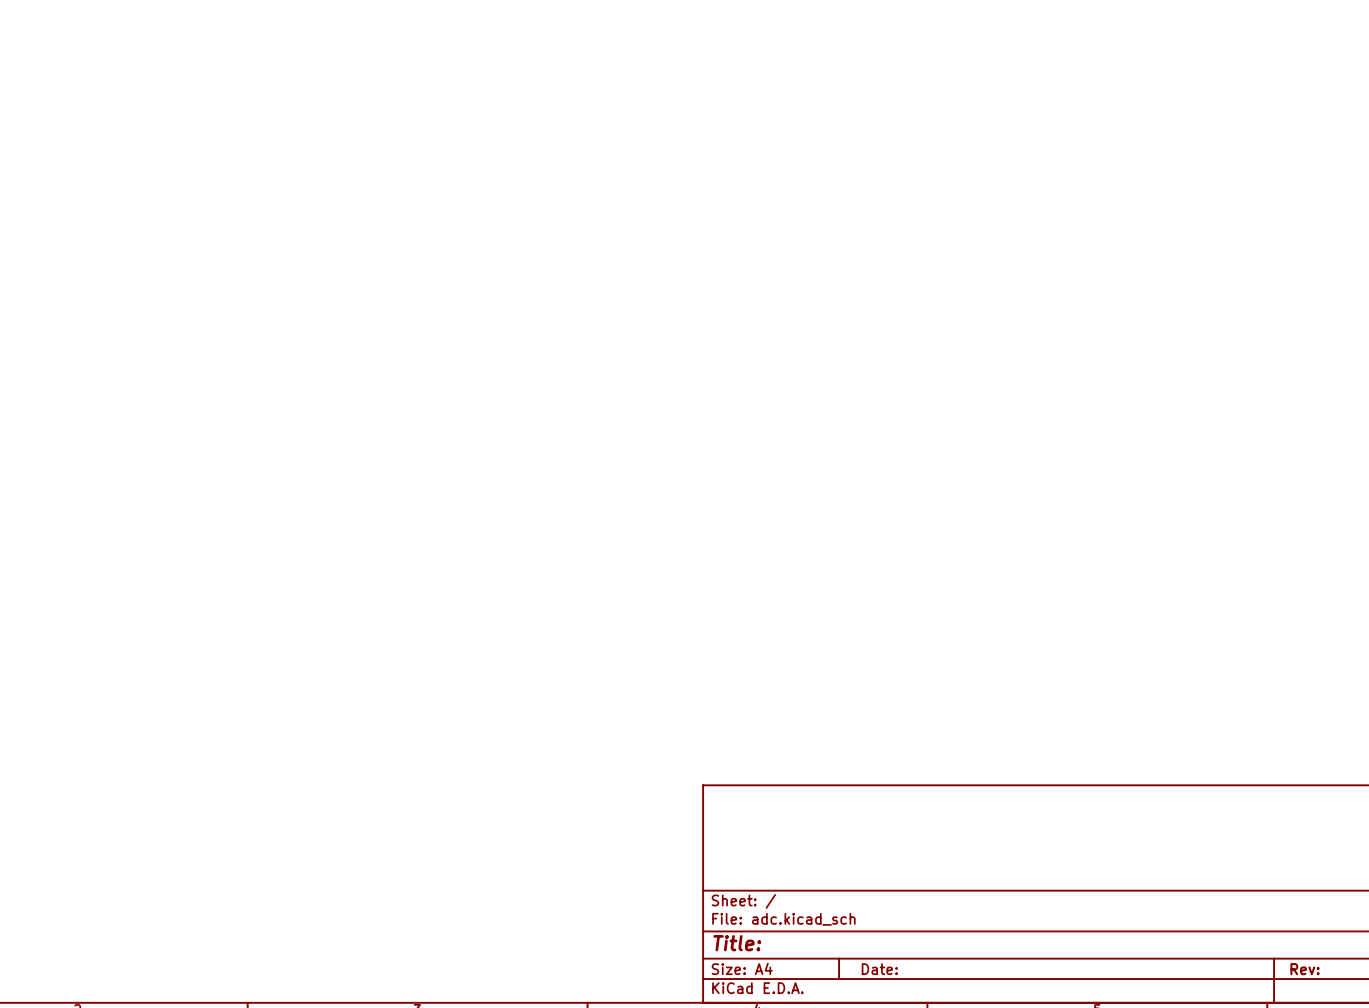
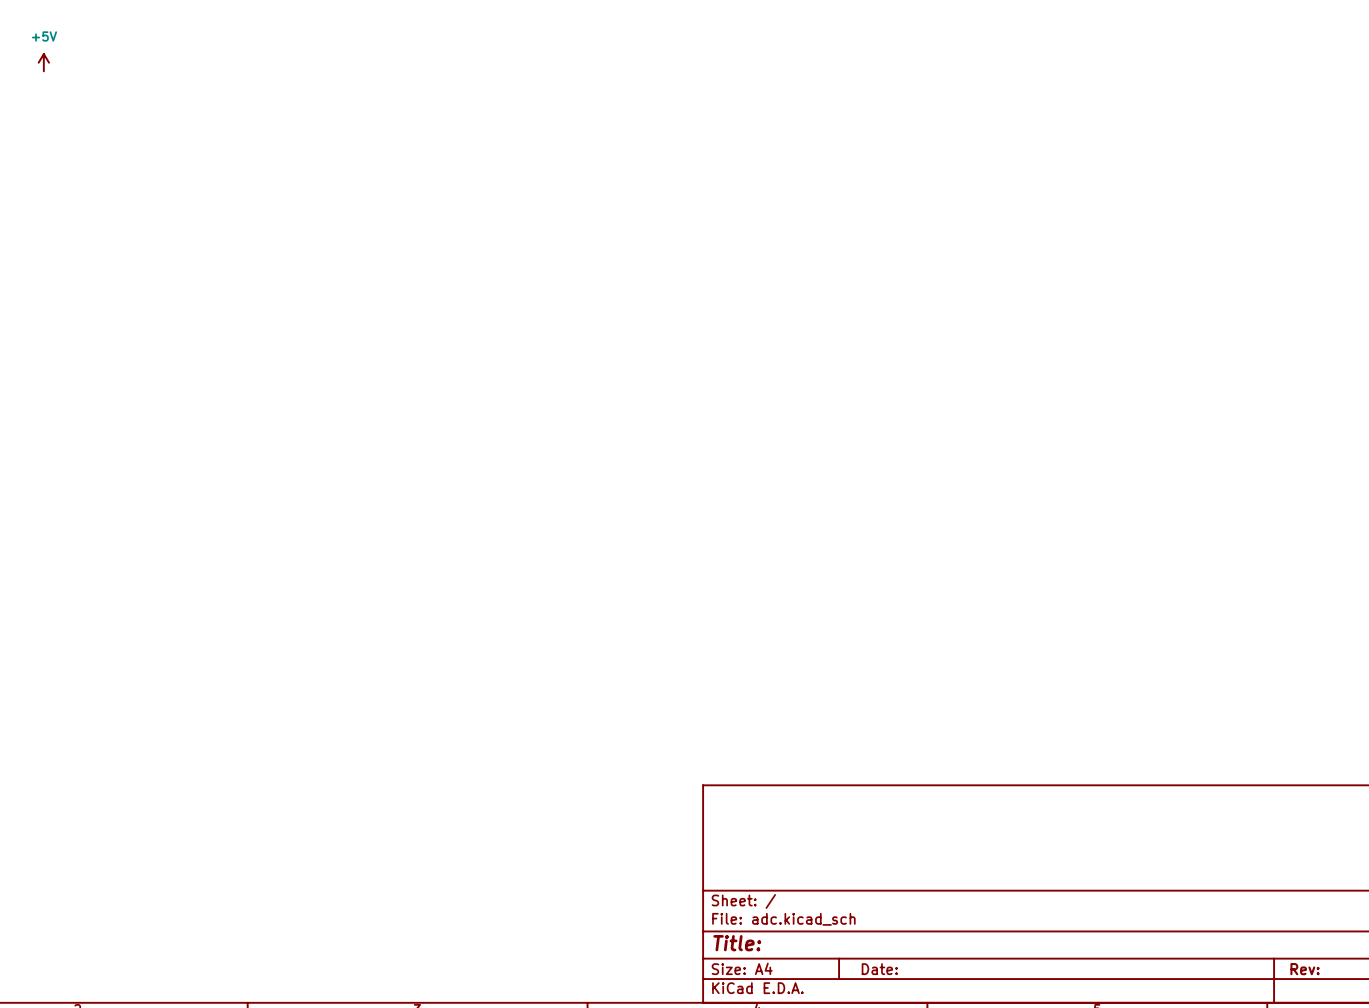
power symbol: none -> +5V (43, 62)

